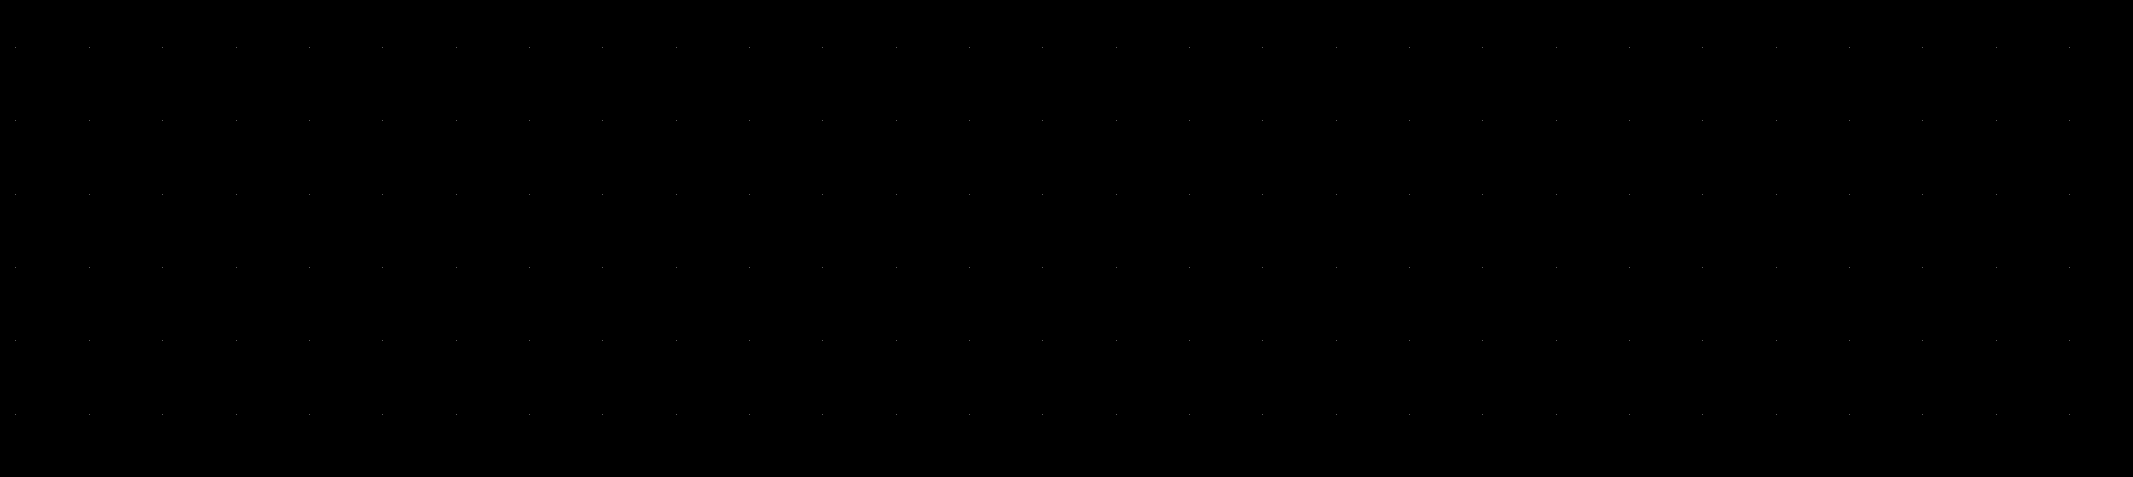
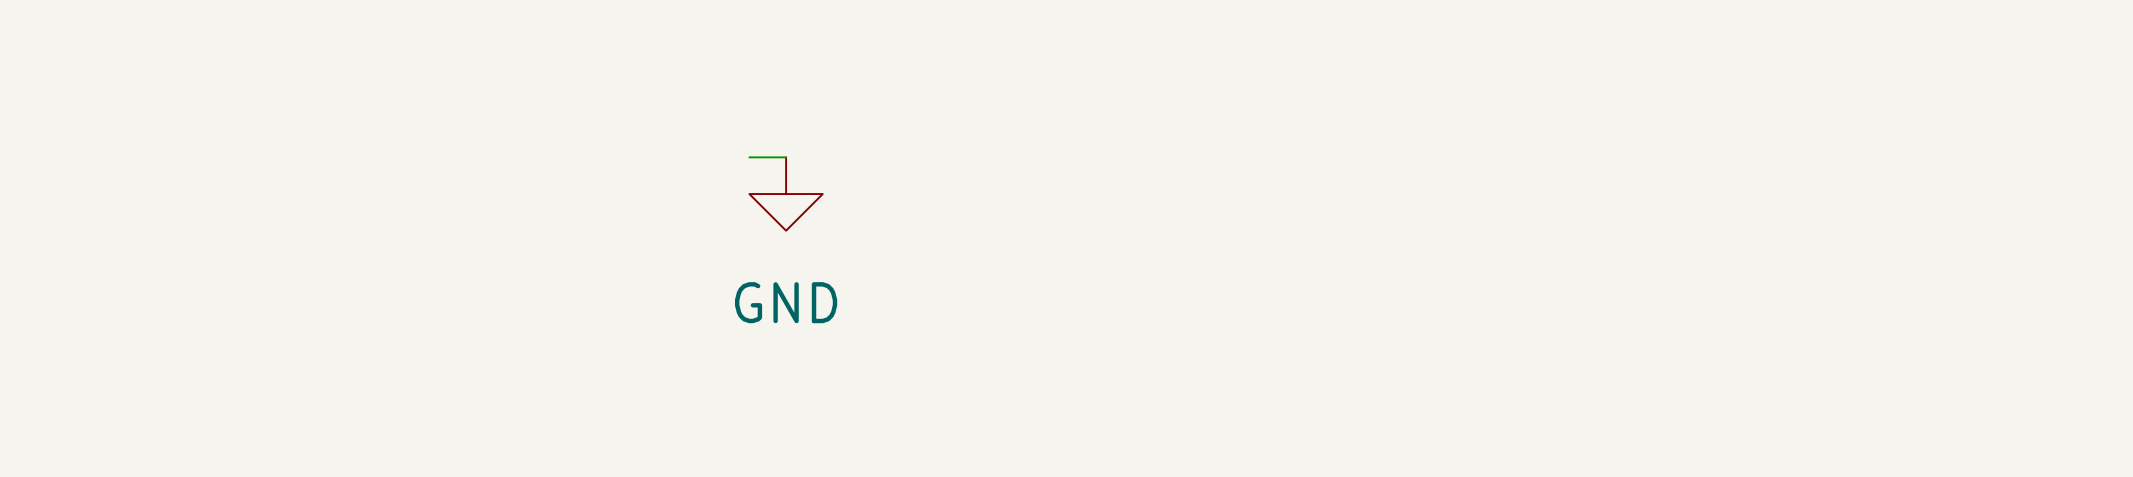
wire: none -> (749, 157) (786, 157)
power symbol: none -> GND (786, 194)

